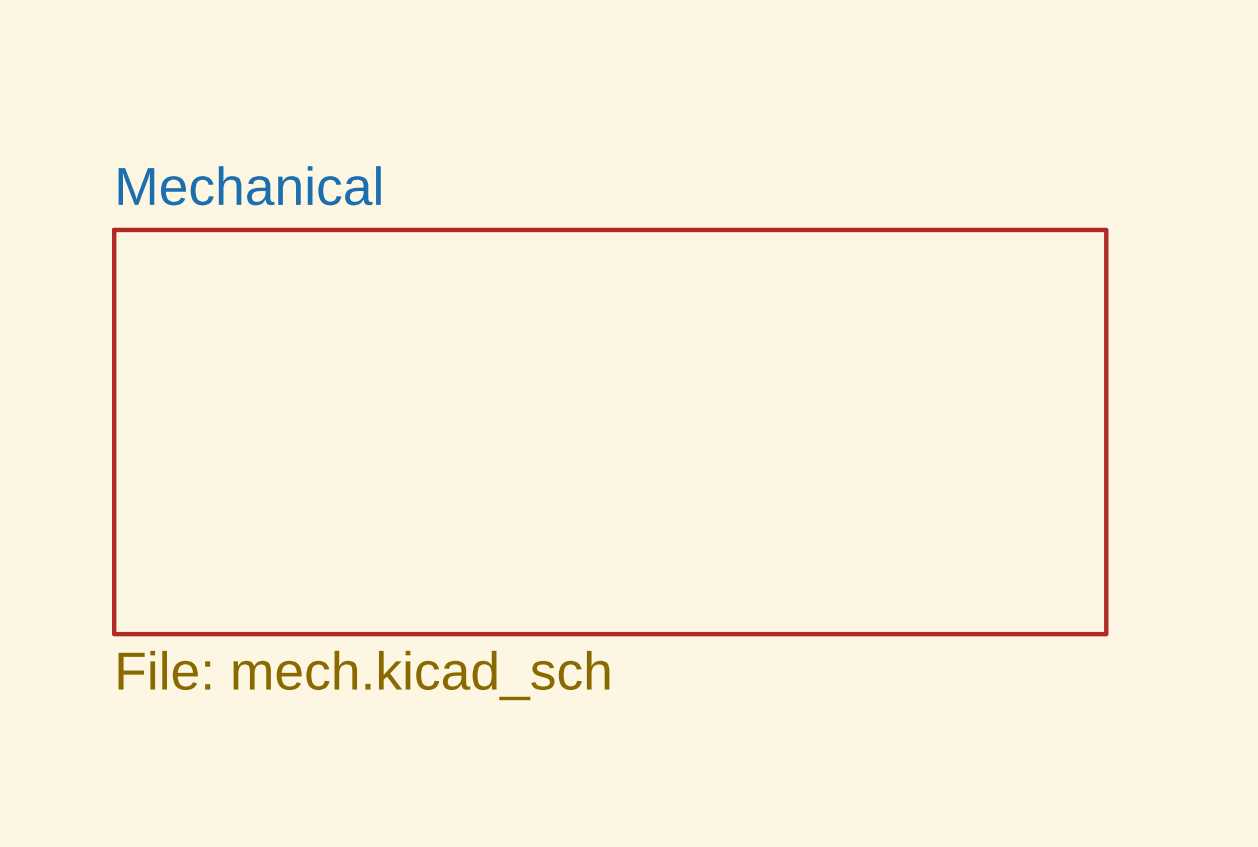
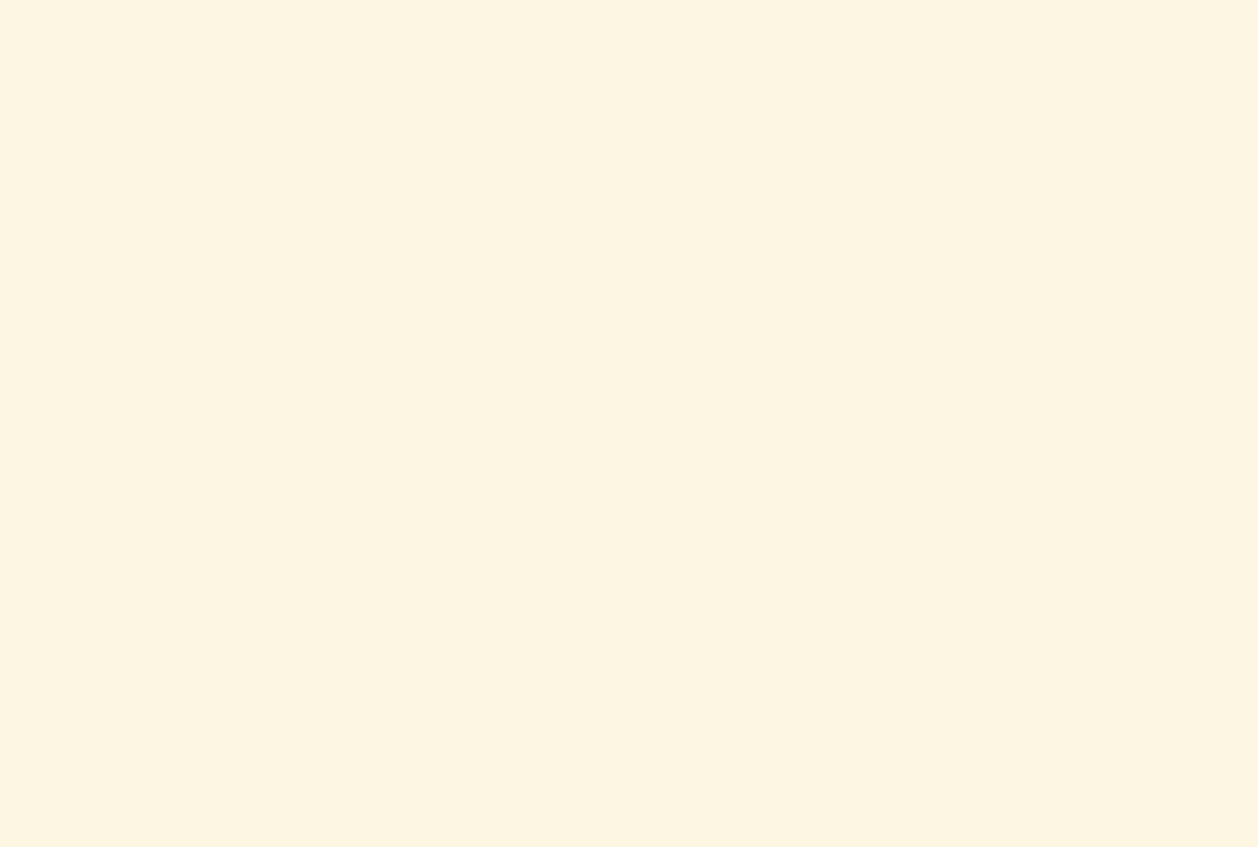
sheet Mechanical: File: mech.kicad_sch (610, 432) -> none

